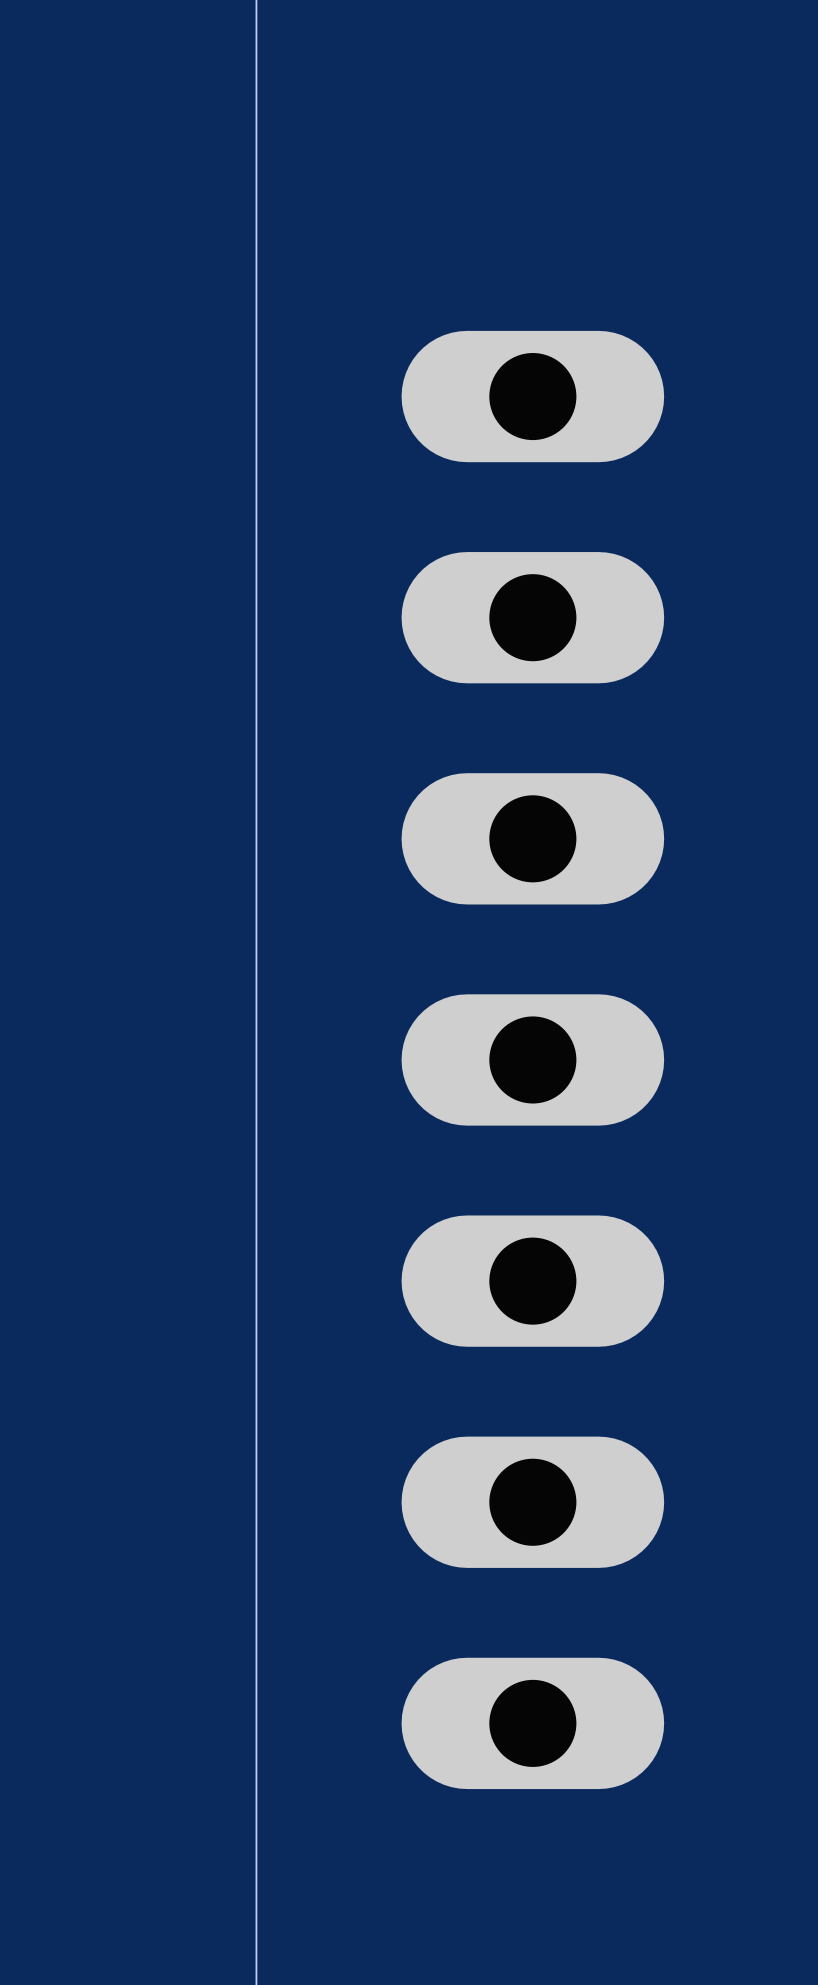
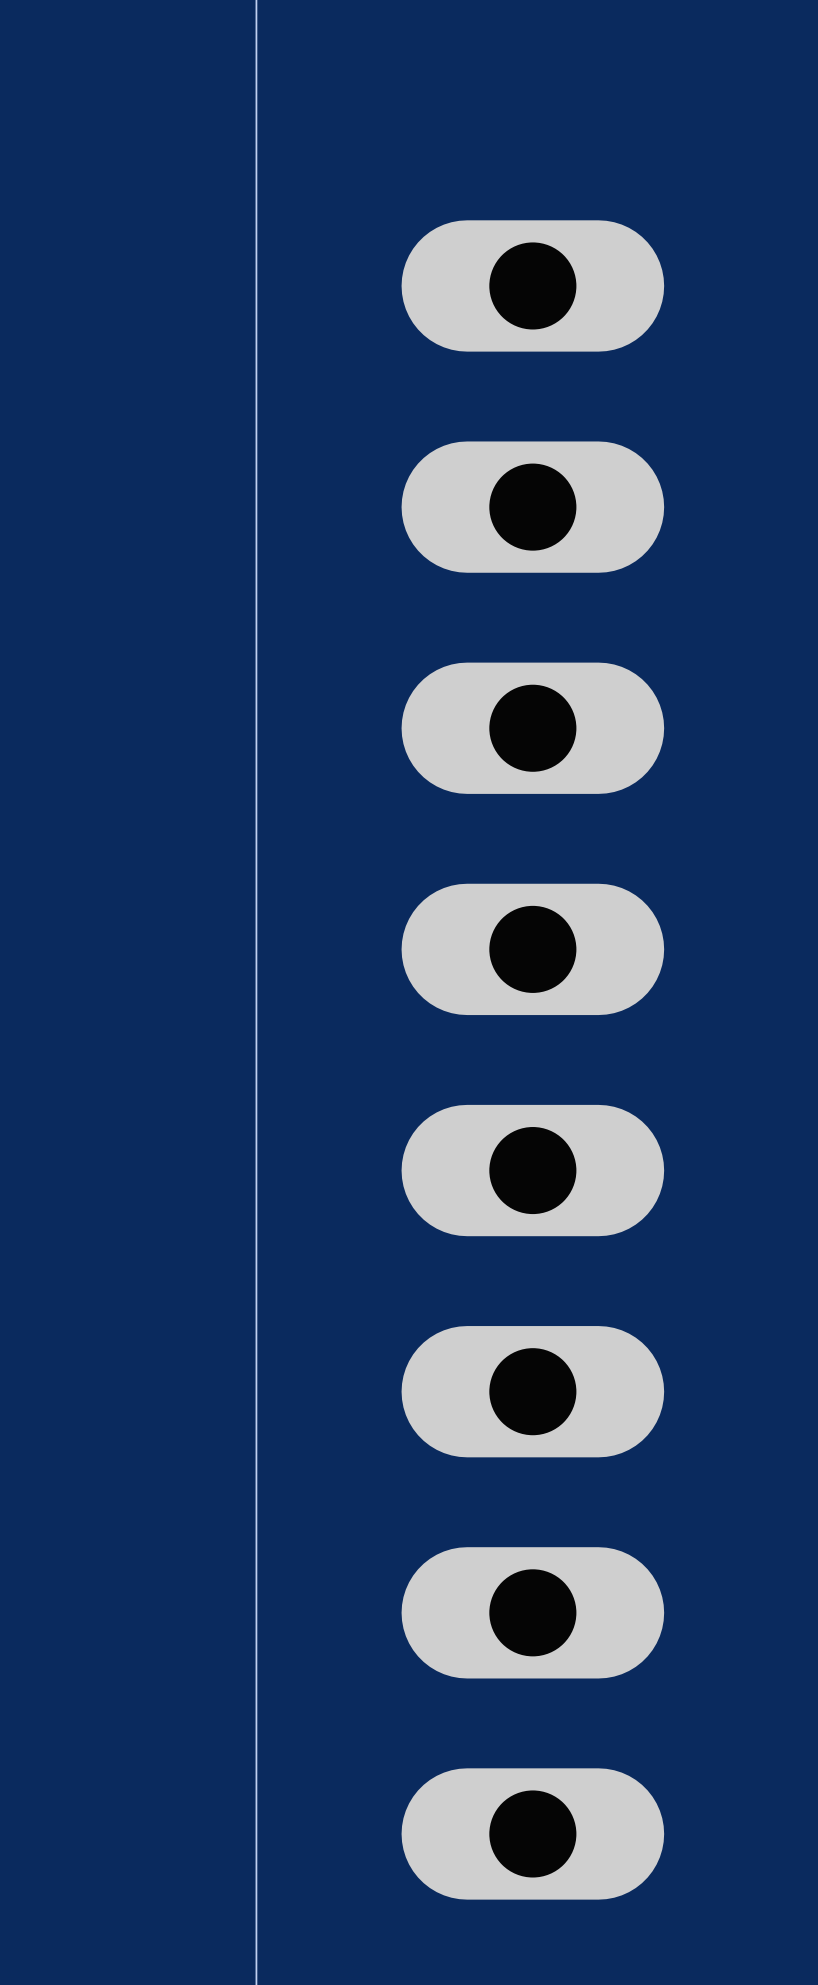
part footprint: [401, 330, 665, 1790] -> [401, 220, 665, 1900]

